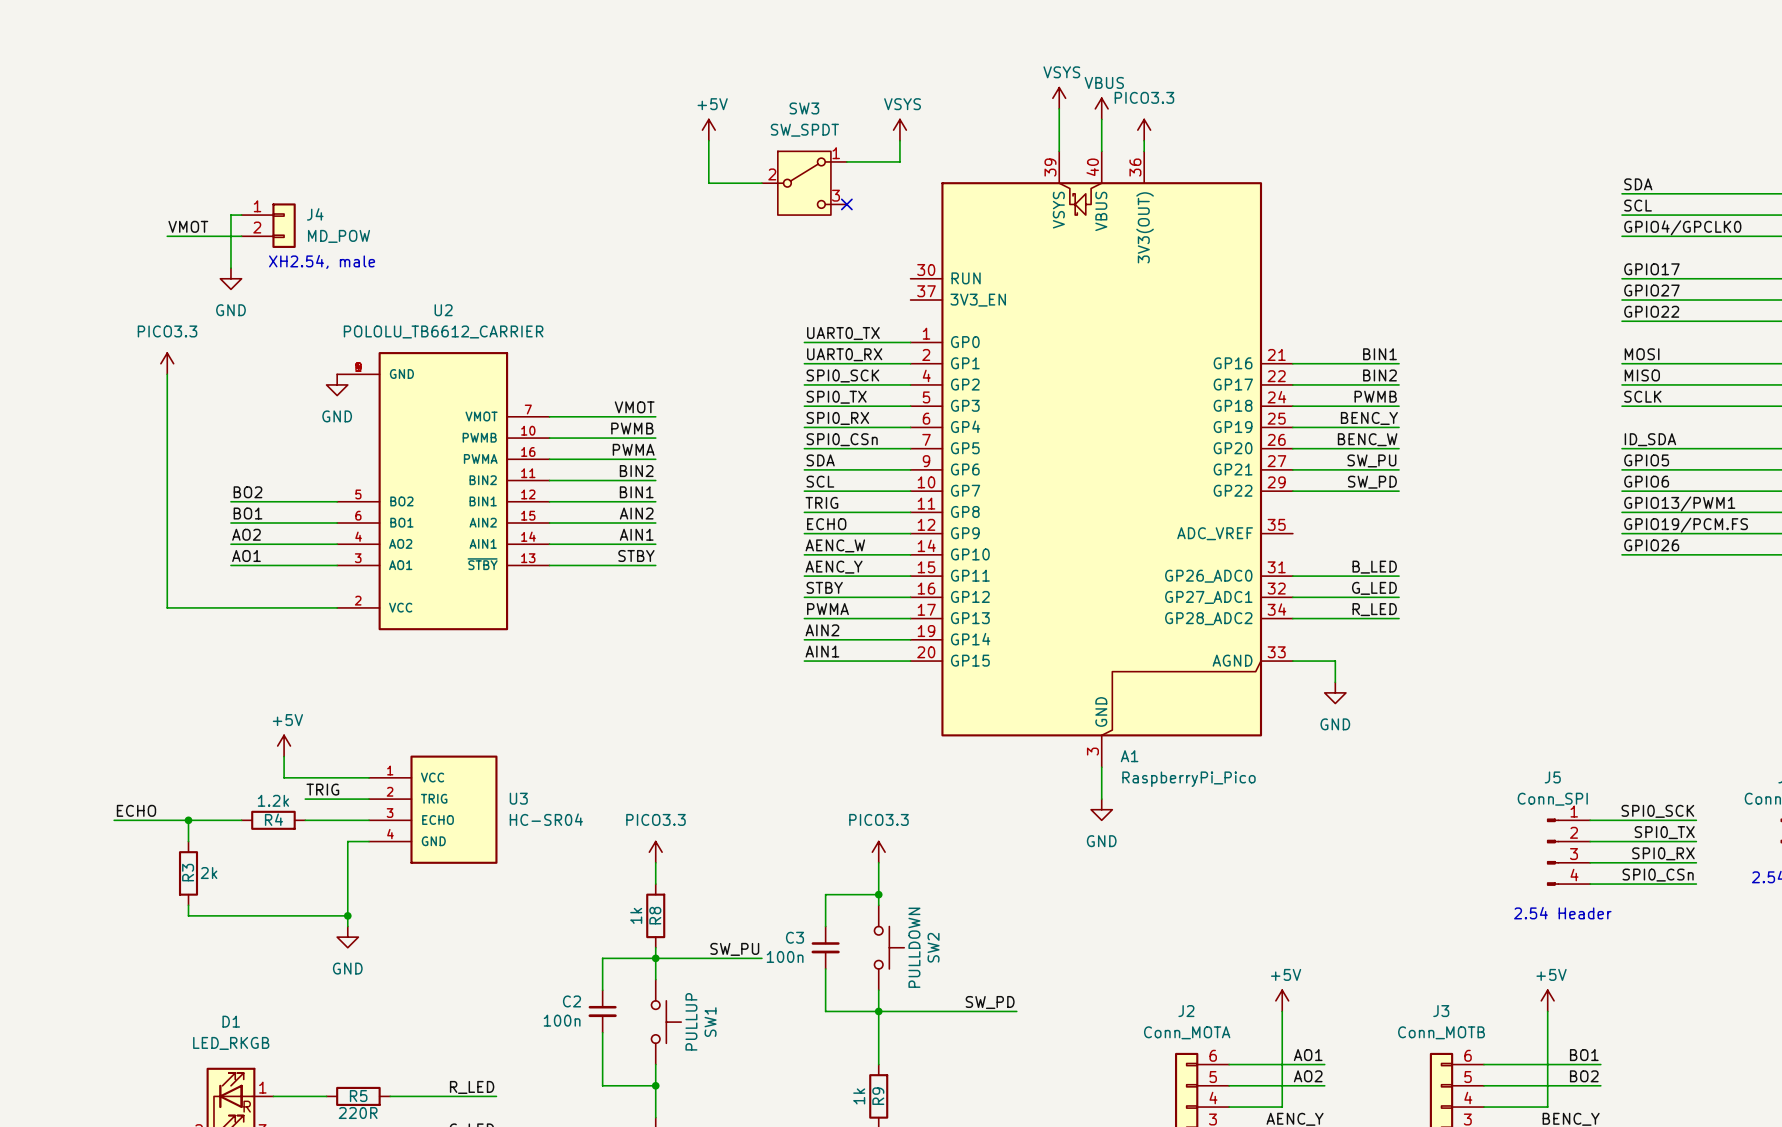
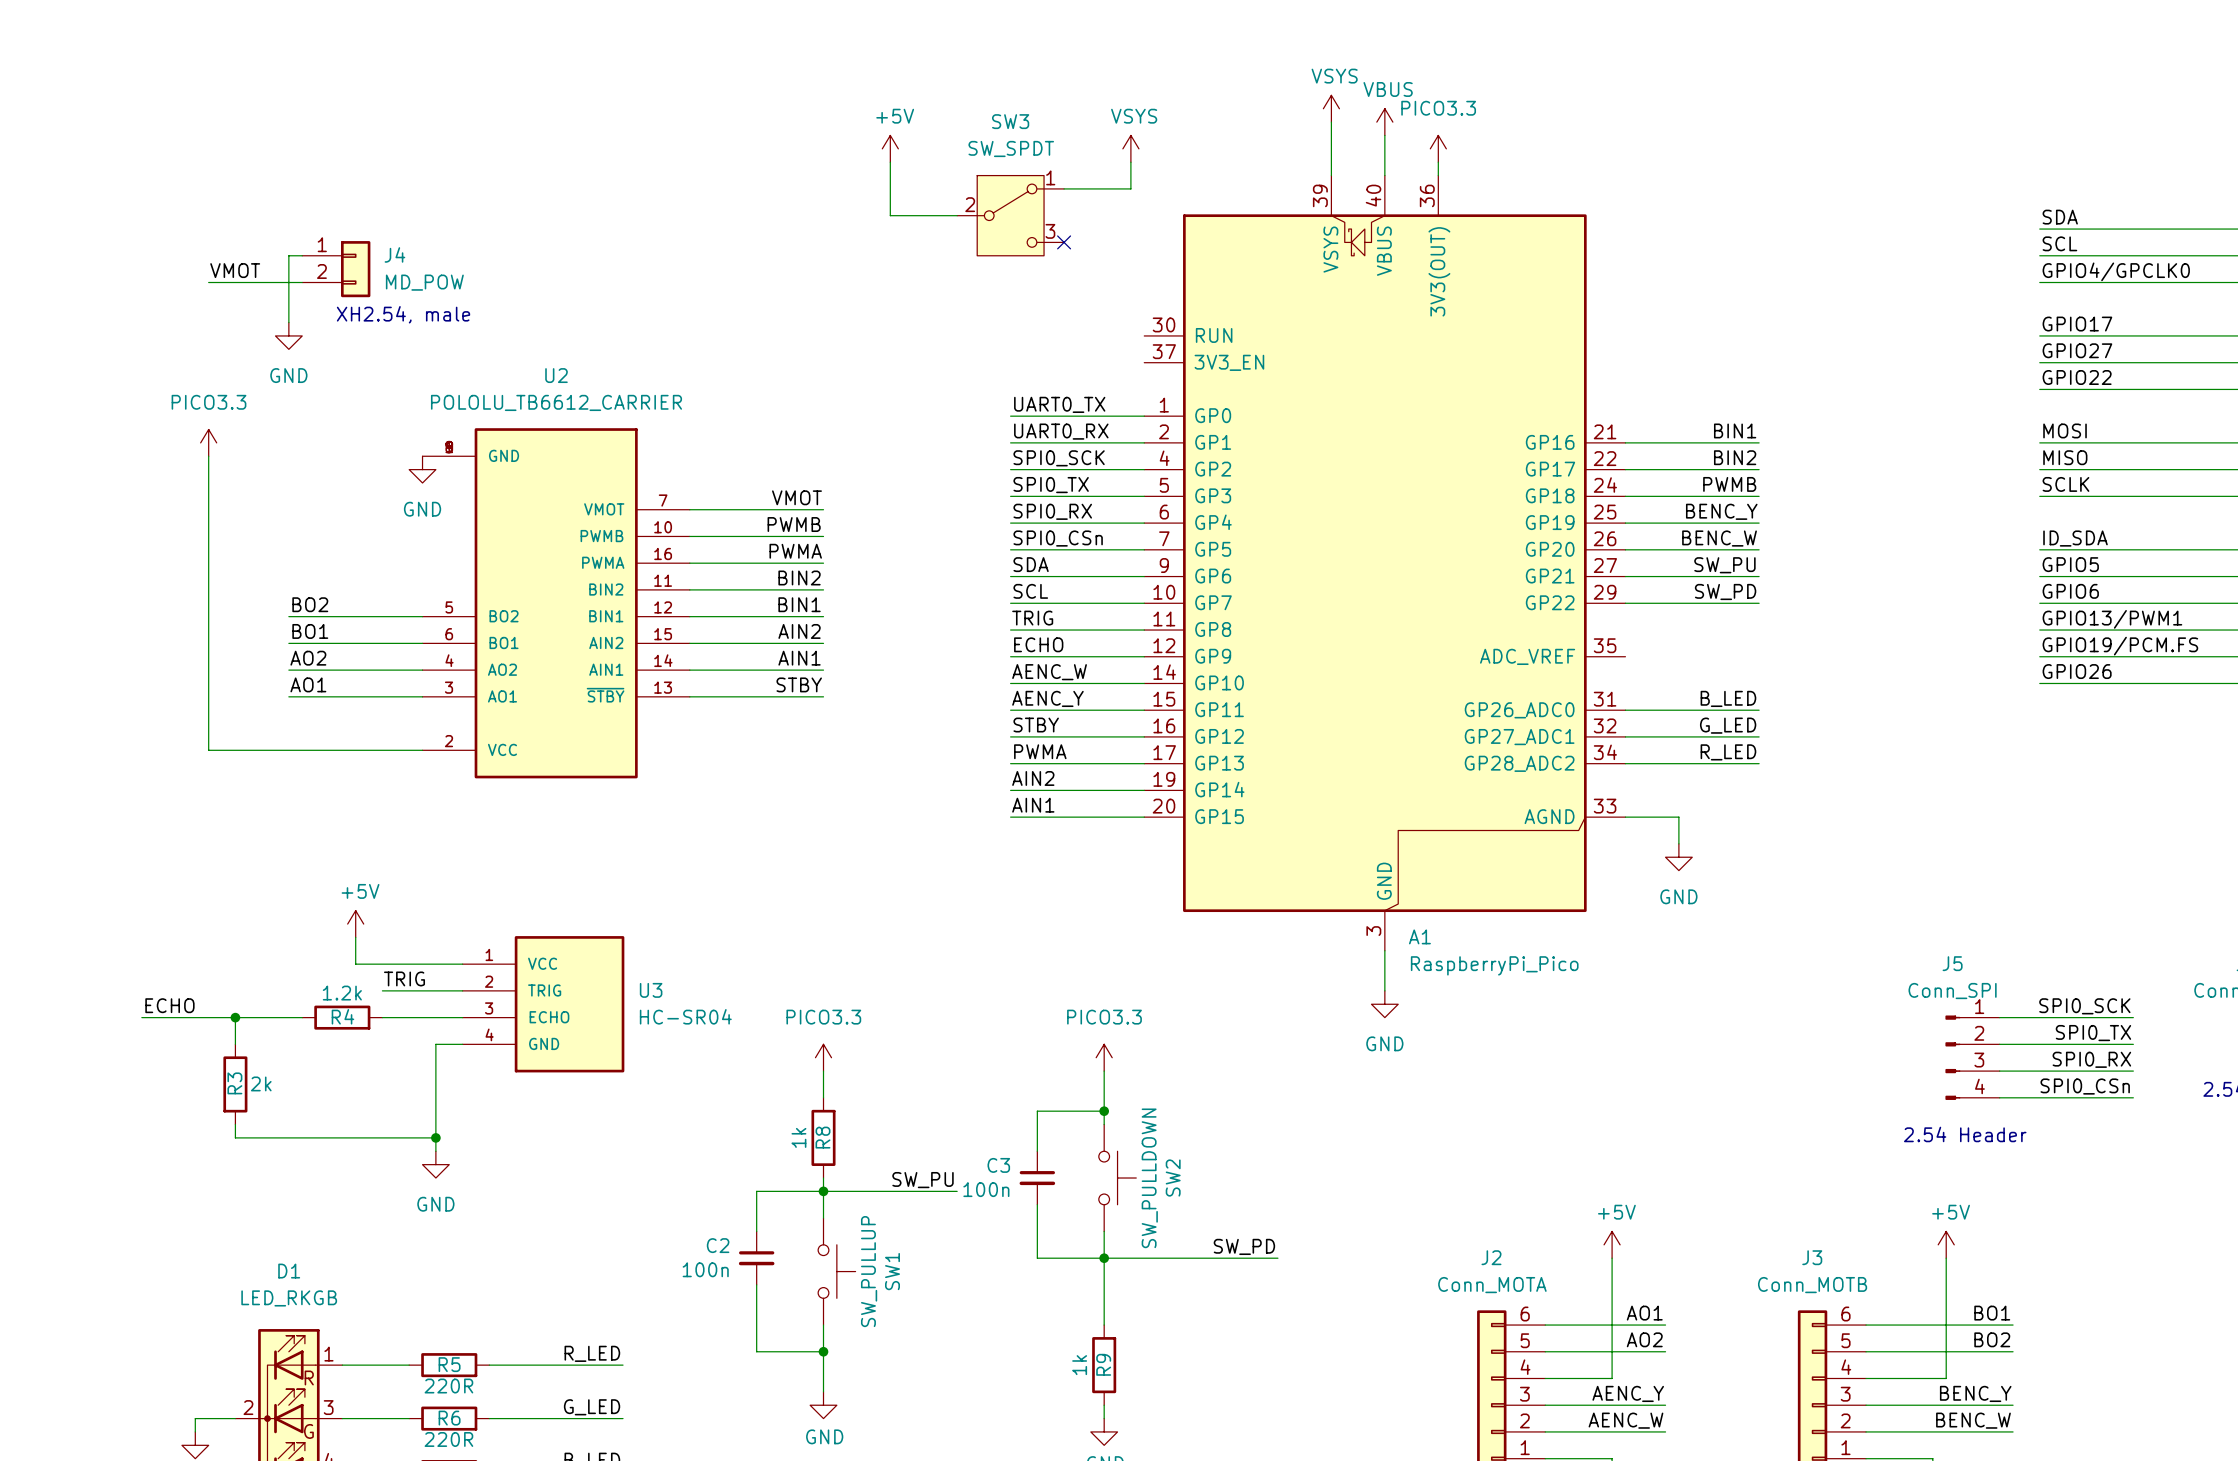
SW2 value: PULLDOWN (914, 947) -> SW_PULLDOWN (1149, 1178)
SW1 value: PULLUP (691, 1021) -> SW_PULLUP (869, 1271)

